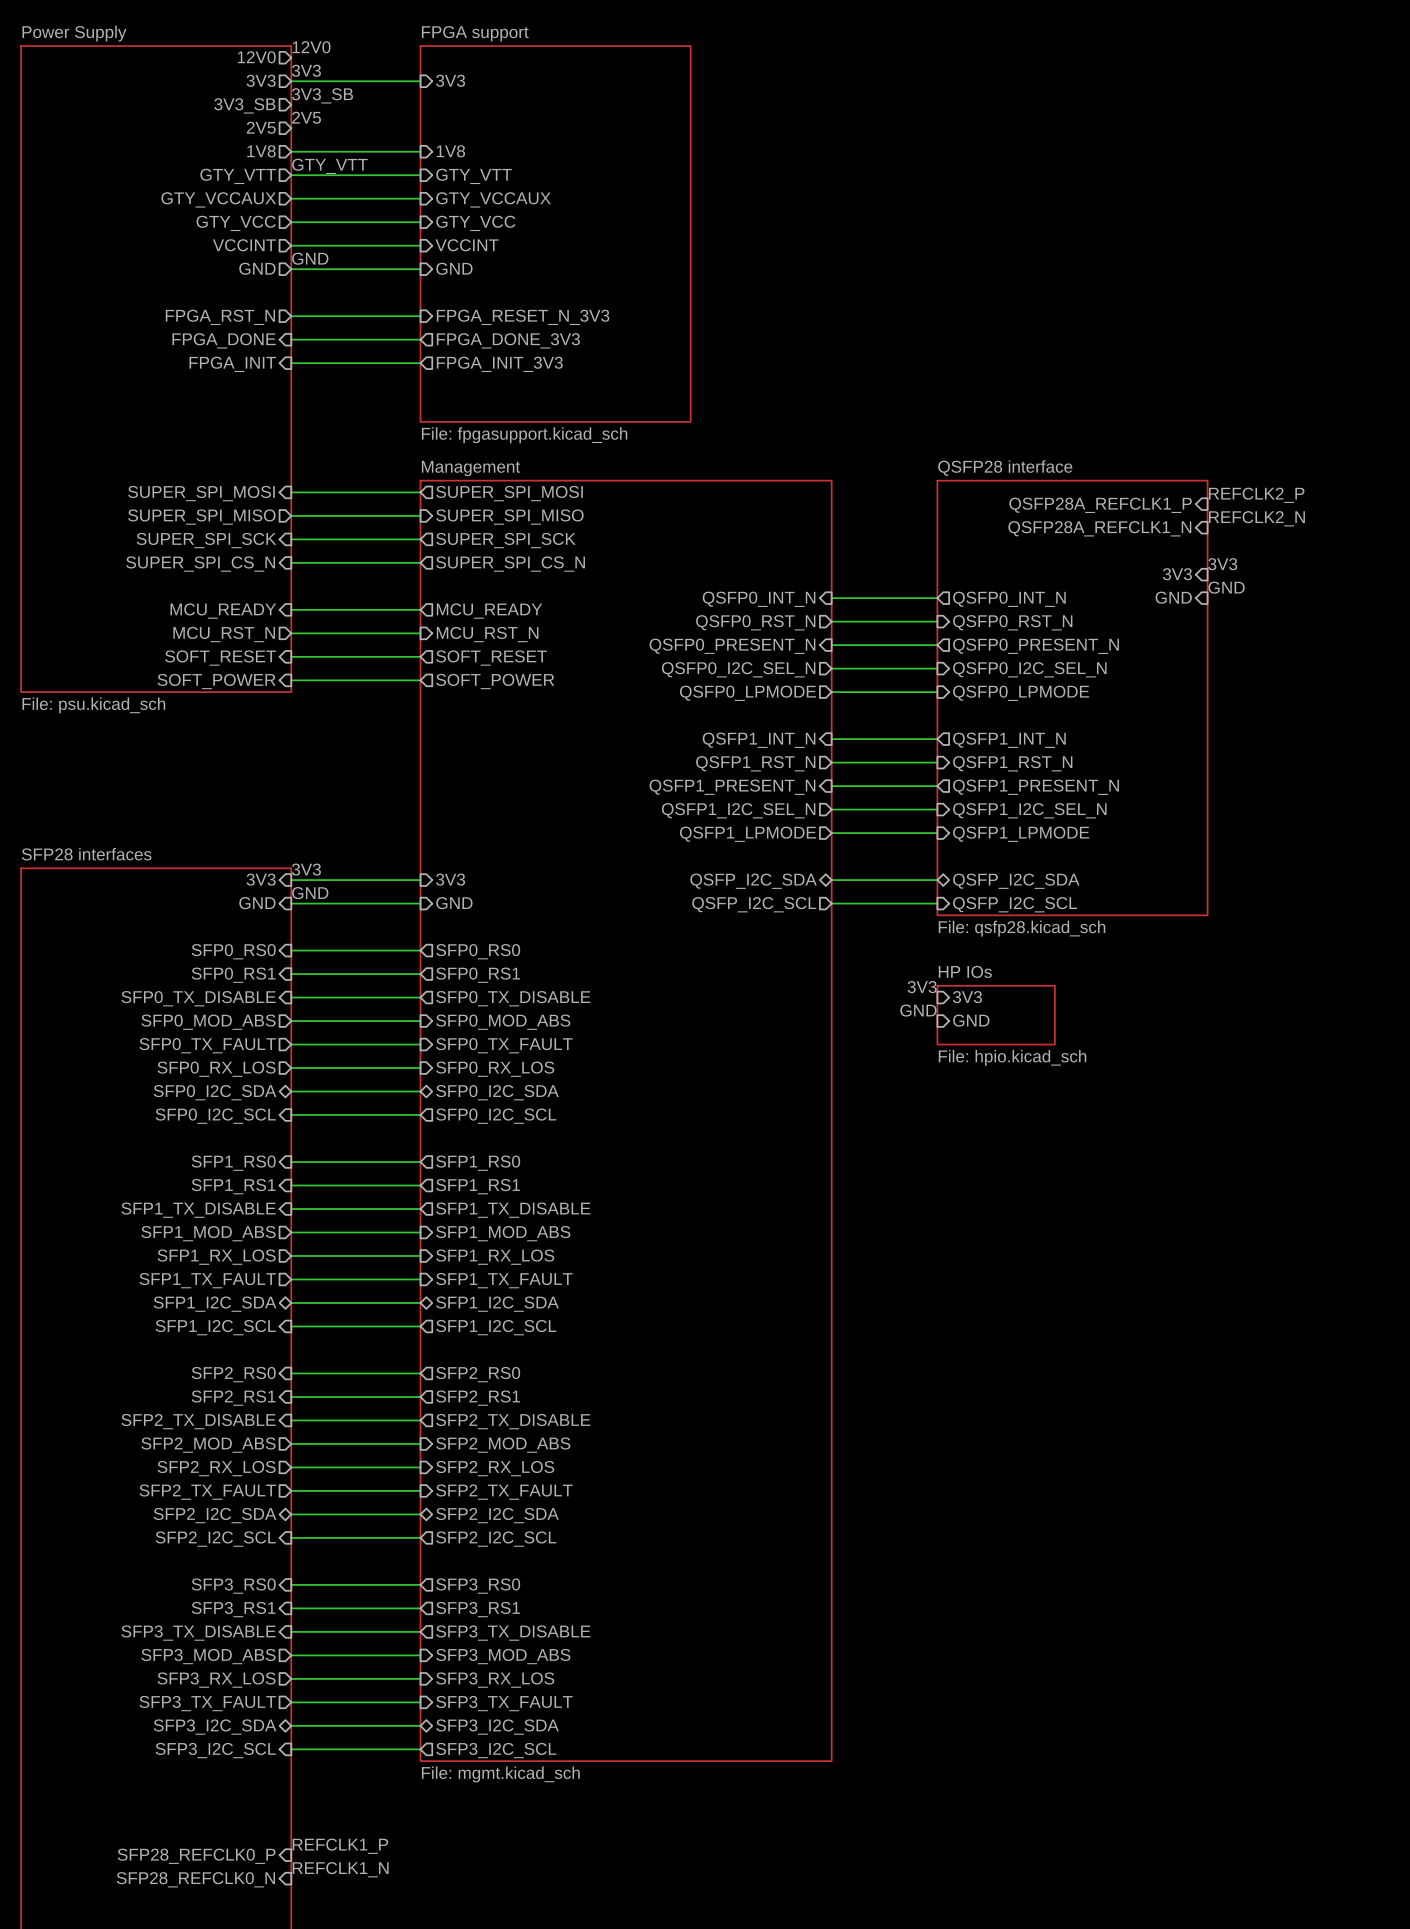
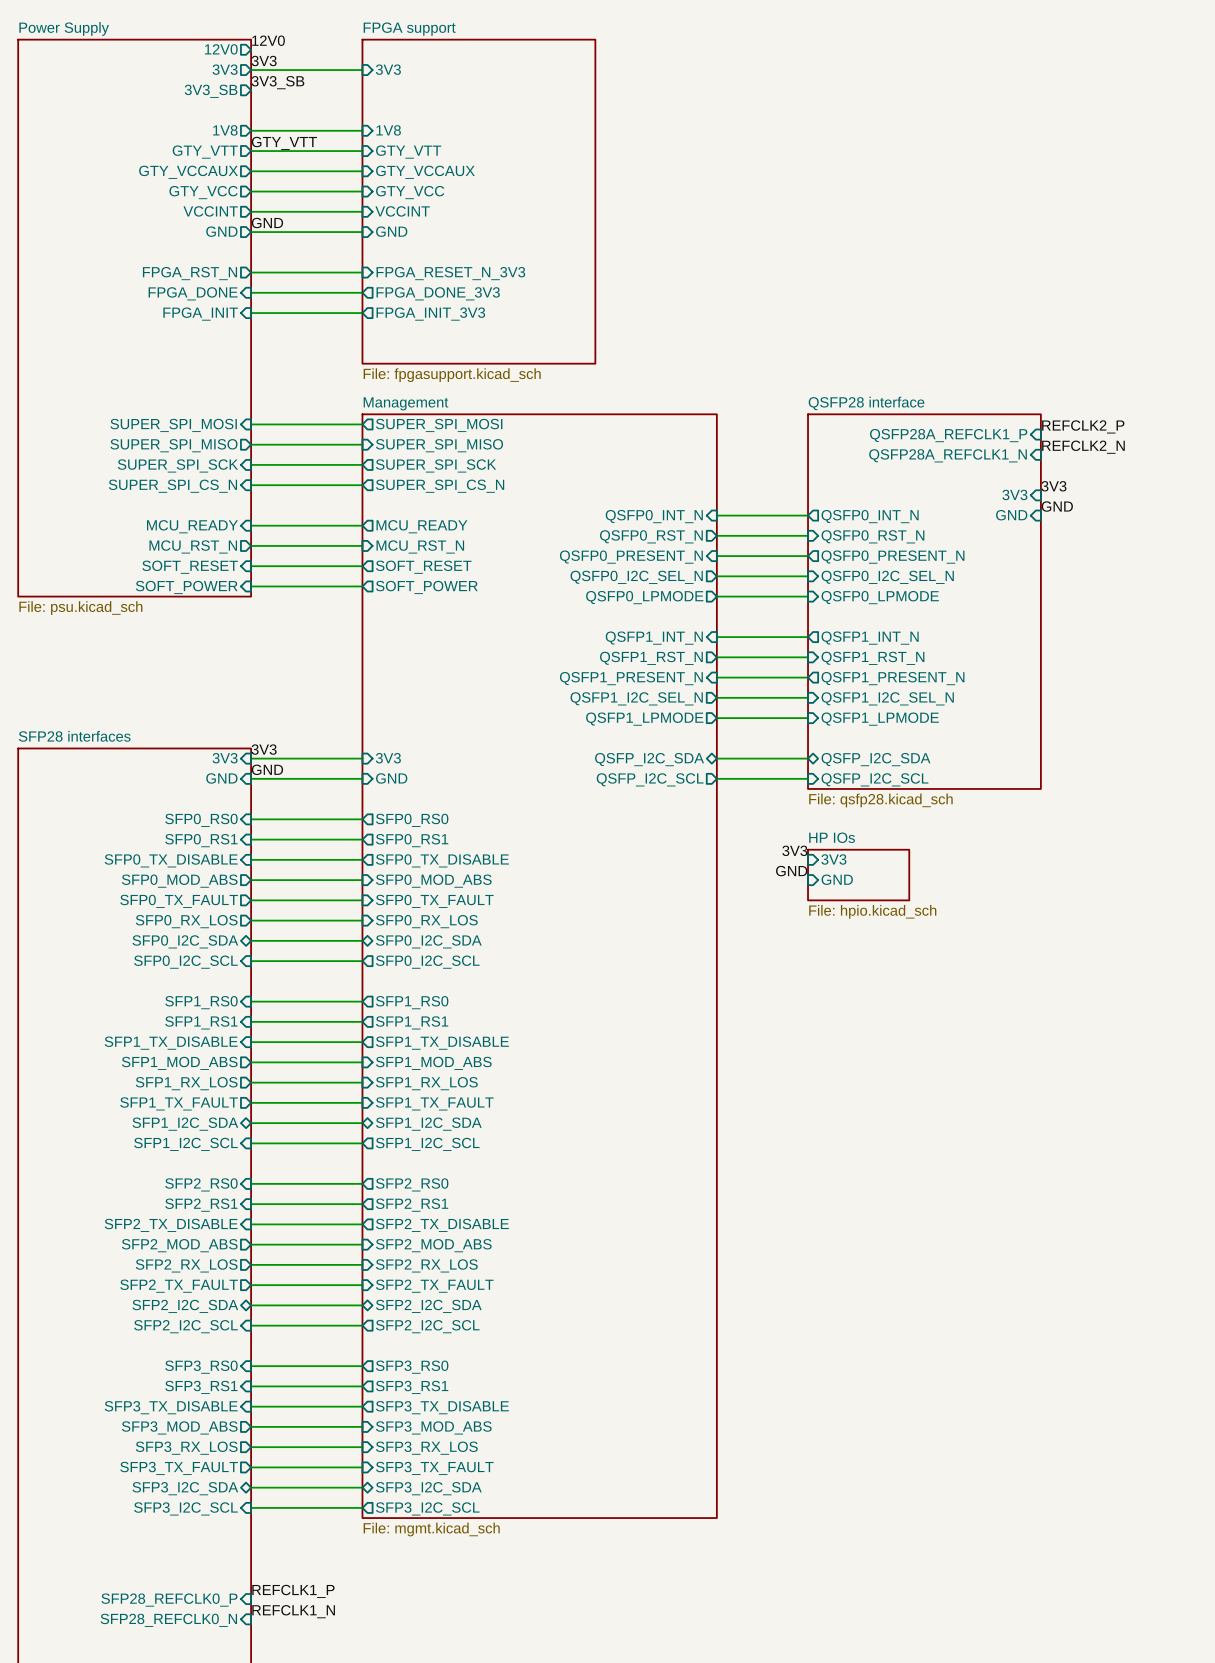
label: 2V5 (306, 117) -> none
sheet pin: 2V5 (261, 127) -> none

